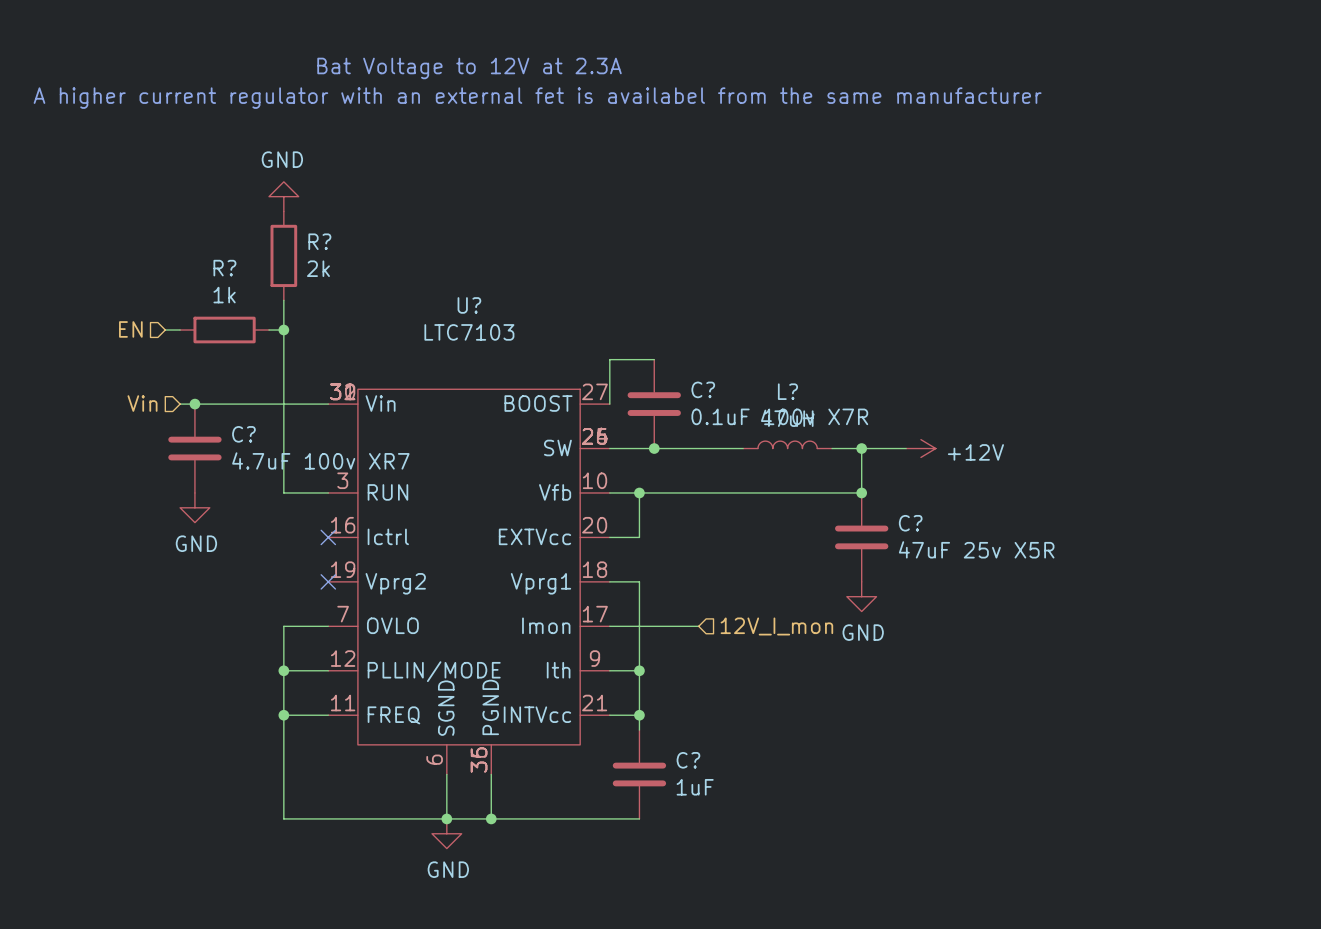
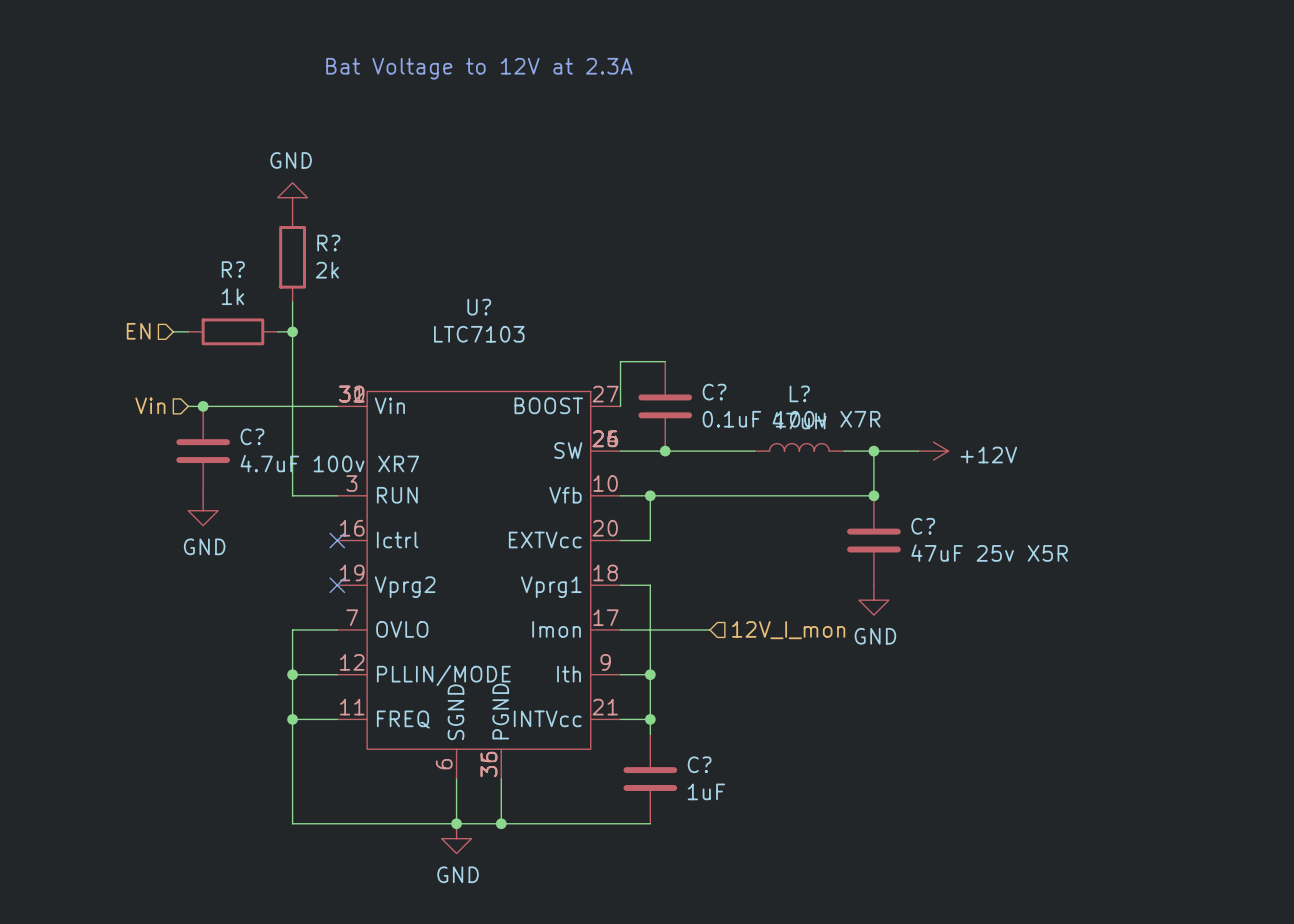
text: A higher current regulator with an external fet is availabel from the same manufacturer (537, 98) -> none

